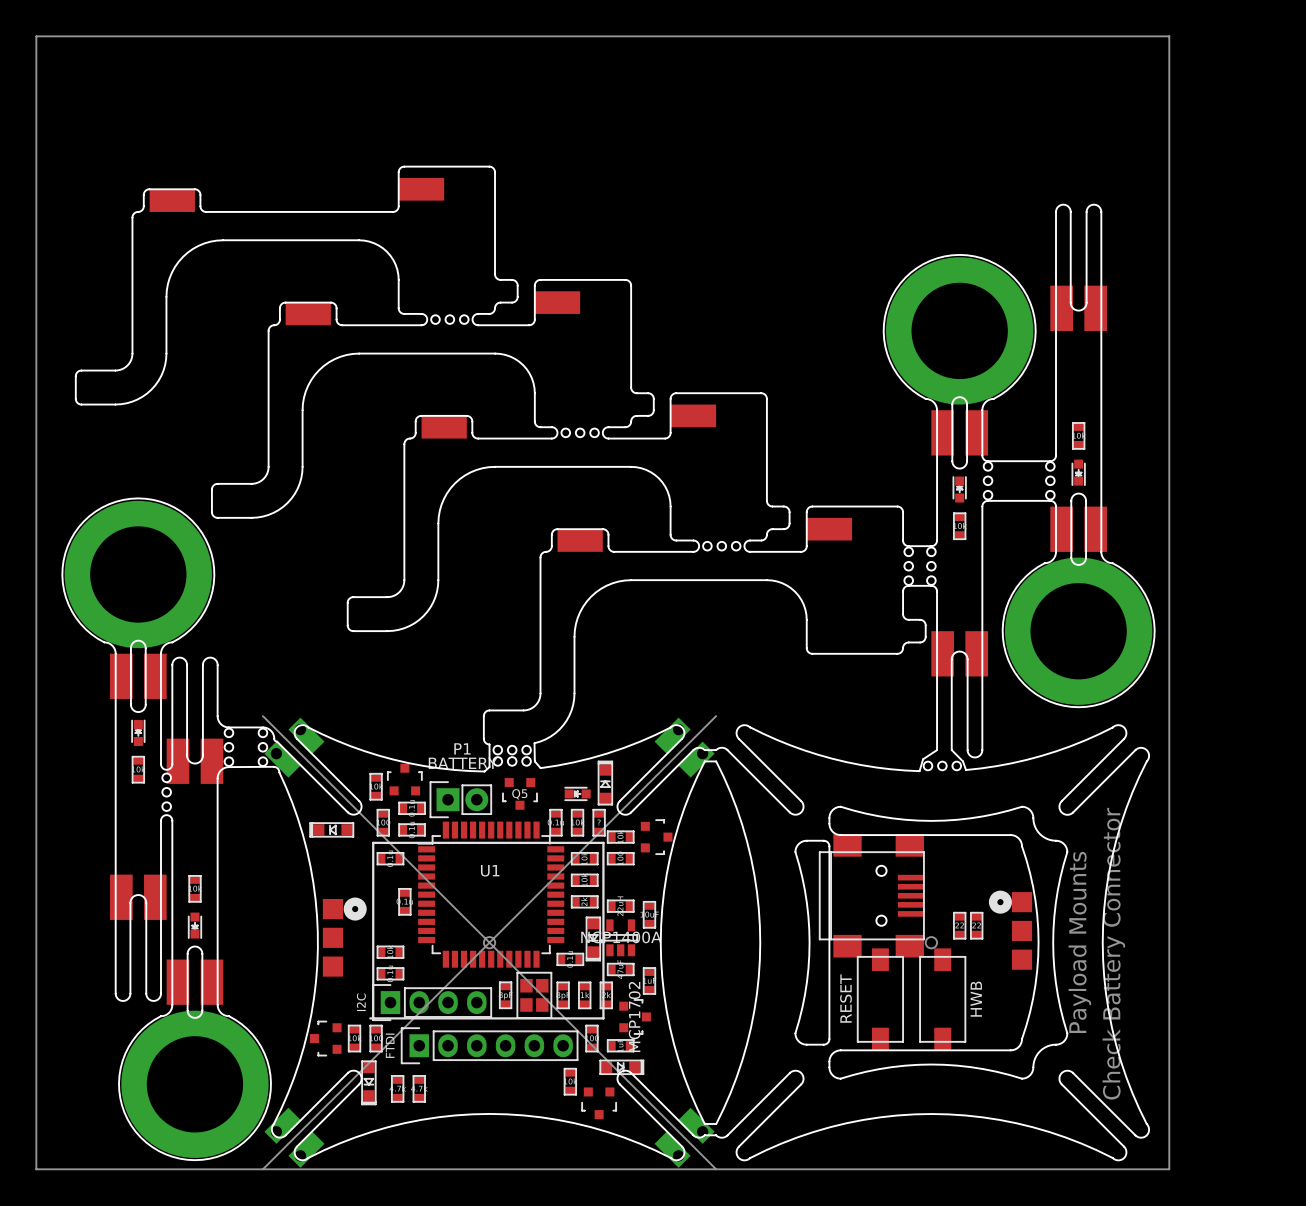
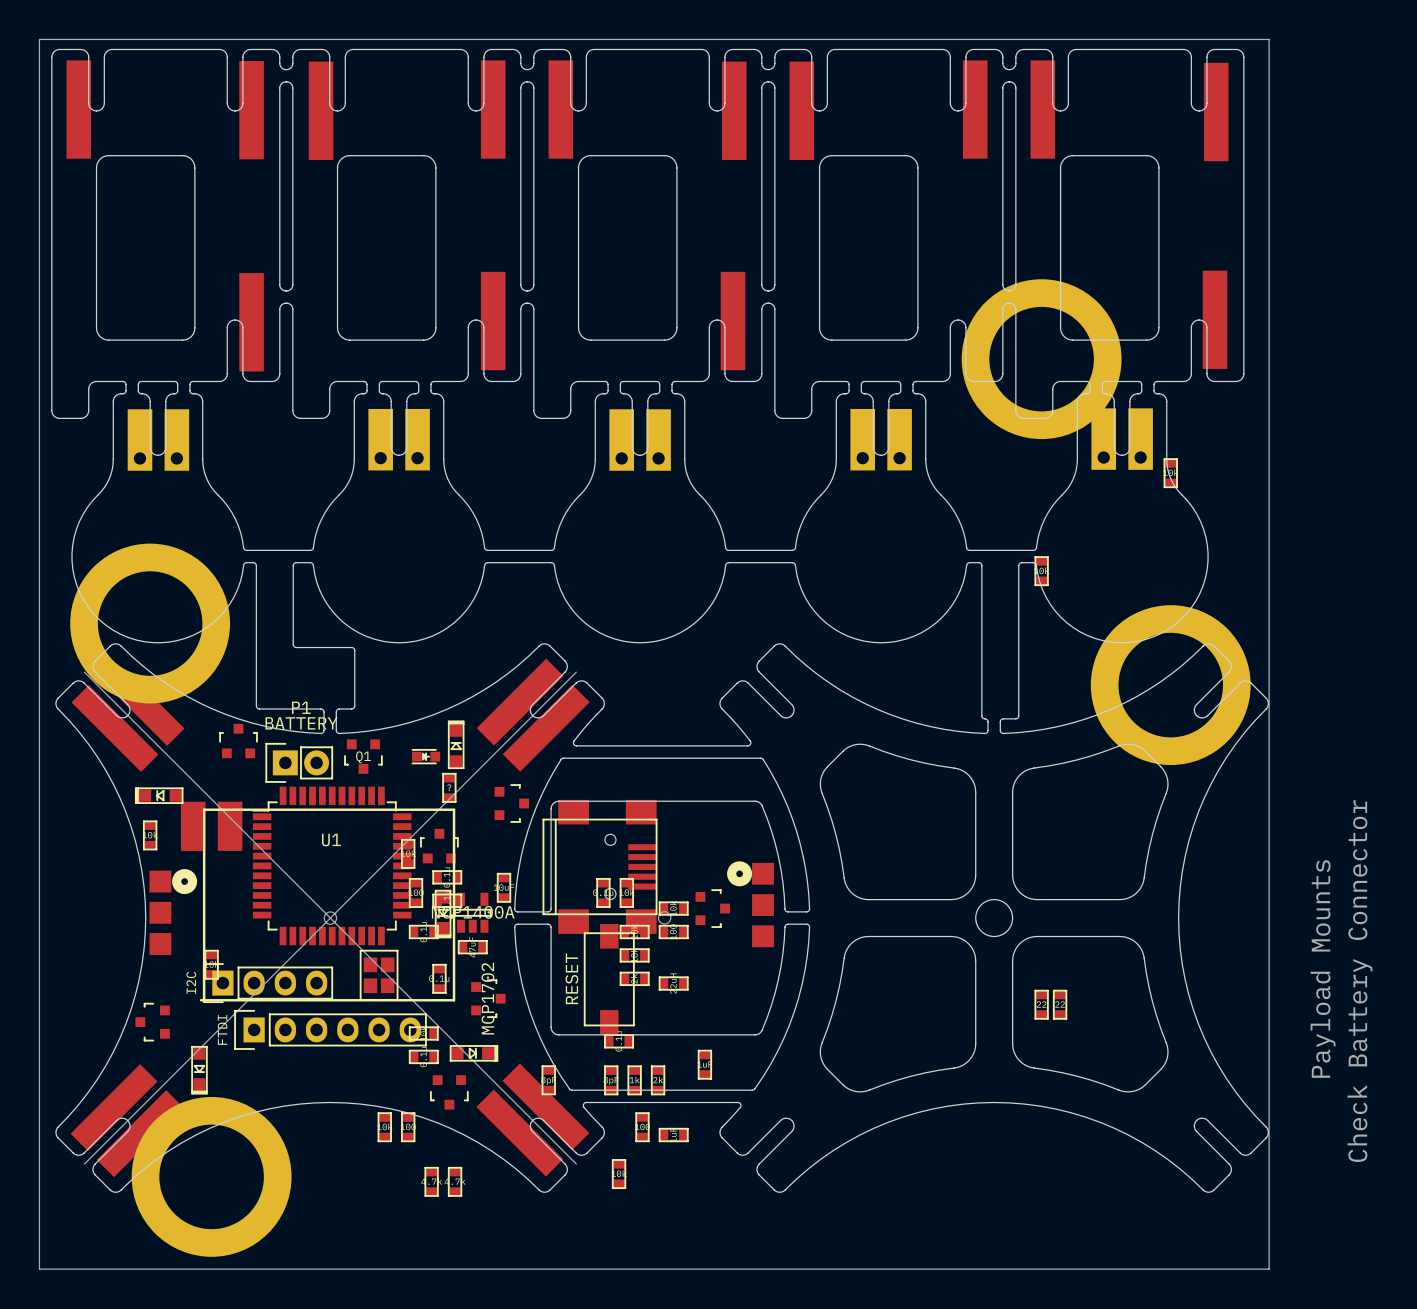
board edge: none -> (80, 49) (85, 51) (88, 55) (88, 104) (91, 109) (96, 110)
board edge: none -> (80, 49) (57, 49) (53, 52) (51, 57) (51, 410) (54, 416) (59, 418)
board edge: none -> (219, 49) (224, 51) (227, 55) (227, 104) (230, 109) (235, 110)
board edge: none -> (219, 49) (109, 50) (104, 56) (104, 103)
board edge: none -> (271, 49) (278, 53) (280, 65) (283, 69) (291, 67) (292, 57)
board edge: none -> (271, 49) (249, 49) (243, 53) (242, 104) (239, 109) (235, 110)
board edge: none -> (321, 49) (326, 51) (329, 55) (329, 104) (332, 109) (337, 110)
board edge: none -> (321, 49) (298, 49) (294, 52) (292, 57)
board edge: none -> (460, 49) (465, 51) (468, 56) (468, 106) (472, 109) (477, 110) (481, 108) (483, 103)
board edge: none -> (460, 49) (349, 50) (345, 56) (345, 104) (342, 109) (337, 110)
board edge: none -> (562, 49) (567, 51) (570, 56) (571, 106) (574, 109) (579, 110) (584, 108) (586, 103)
board edge: none -> (562, 49) (539, 49) (535, 52) (533, 57)
board edge: none -> (754, 49) (760, 52) (762, 65) (767, 69) (774, 66) (775, 55) (778, 50) (803, 49)
board edge: none -> (754, 49) (731, 49) (725, 53) (724, 104) (721, 109) (717, 110) (712, 109) (709, 105) (709, 56) (704, 50) (592, 49) (586, 56) (586, 103)
board edge: none -> (803, 49) (808, 51) (811, 55) (811, 104) (814, 109) (819, 110)
board edge: none -> (942, 49) (947, 51) (950, 56) (950, 106) (954, 109) (959, 110) (963, 108) (965, 103)
board edge: none -> (942, 49) (834, 49) (829, 51) (827, 57)
board edge: none -> (1183, 49) (1188, 51) (1191, 55) (1191, 104) (1193, 108) (1199, 110)
board edge: none -> (1183, 49) (1072, 50) (1068, 56) (1068, 104) (1066, 108) (1060, 110)
board edge: none -> (483, 57) (483, 103)
board edge: none -> (483, 57) (485, 52) (489, 49) (515, 49) (520, 54) (521, 66) (526, 69) (533, 66) (533, 57)
board edge: none -> (827, 57) (827, 104) (824, 109) (819, 110)
board edge: none -> (1206, 57) (1206, 104) (1204, 108) (1199, 110)
board edge: none -> (1206, 57) (1209, 51) (1214, 49) (1238, 49) (1243, 56) (1243, 374) (1241, 379) (1237, 381) (1213, 381) (1208, 378) (1206, 326) (1203, 321) (1197, 320) (1191, 326) (1190, 377) (1184, 381) (1155, 381) (1154, 391) (1158, 393)
board edge: none -> (285, 81) (291, 83) (292, 88) (292, 284) (291, 289) (286, 290) (281, 289) (279, 284) (279, 88) (281, 83) (285, 81)
board edge: none -> (526, 81) (532, 83) (533, 88) (533, 284) (532, 289) (527, 290) (522, 289) (520, 284) (520, 88) (522, 83) (526, 81)
board edge: none -> (767, 81) (773, 83) (774, 88) (774, 284) (773, 289) (768, 290) (763, 289) (761, 284) (761, 88) (763, 83) (767, 81)
board edge: none -> (1008, 81) (1014, 83) (1015, 88) (1015, 284) (1014, 289) (1009, 290) (1004, 289) (1002, 284) (1002, 88) (1004, 83) (1008, 81)
board edge: none -> (104, 103) (102, 108) (96, 110)
board edge: none -> (965, 103) (965, 57) (969, 51) (998, 50) (1002, 54) (1003, 66) (1009, 69) (1015, 66) (1016, 55) (1019, 50) (1045, 49) (1050, 51) (1052, 56) (1053, 105) (1055, 109) (1060, 110)
part: none -> (78, 109)
part: none -> (493, 109)
part: none -> (560, 109)
part: none -> (975, 109)
part: none -> (1042, 109)
part: none -> (251, 110)
part: none -> (321, 110)
part: none -> (734, 110)
part: none -> (801, 110)
part: none -> (1216, 112)
board edge: none -> (108, 155) (184, 155) (190, 158) (193, 163) (194, 327) (192, 335) (187, 339) (107, 340) (101, 337) (97, 332) (96, 167) (100, 159) (108, 155)
board edge: none -> (349, 155) (425, 155) (431, 158) (434, 163) (435, 327) (433, 335) (428, 339) (348, 340) (342, 337) (338, 332) (337, 167) (341, 159) (349, 155)
board edge: none -> (590, 155) (666, 155) (672, 158) (675, 163) (676, 327) (674, 335) (669, 339) (589, 340) (583, 337) (579, 332) (578, 167) (582, 159) (590, 155)
board edge: none -> (831, 155) (907, 155) (913, 158) (916, 163) (917, 327) (915, 335) (910, 339) (830, 340) (824, 337) (820, 332) (819, 167) (823, 159) (831, 155)
board edge: none -> (1072, 155) (1148, 155) (1154, 158) (1158, 163) (1158, 327) (1156, 335) (1151, 339) (1071, 340) (1065, 337) (1061, 332) (1060, 167) (1064, 159) (1072, 155)
part: (421, 189) -> none
part: (172, 200) -> none
part: none -> (1215, 319)
part: none -> (493, 321)
part: none -> (732, 321)
part: none -> (251, 322)
board edge: none -> (227, 327) (228, 323) (233, 320) (239, 321) (242, 324) (242, 373) (245, 379) (250, 381) (274, 380) (279, 374) (280, 307) (285, 303) (291, 305) (292, 411) (295, 416) (300, 418)
board edge: none -> (227, 327) (226, 377) (220, 381) (191, 381) (189, 391) (199, 395) (202, 400) (202, 459) (204, 473) (211, 487) (227, 506) (235, 518) (244, 549) (312, 549) (321, 518) (350, 478) (354, 459)
part: (557, 302) -> none
part: (1078, 308) -> none
part: (308, 313) -> none
part: (449, 319) -> none
board edge: none -> (520, 373) (520, 308) (523, 304) (528, 303) (533, 308) (533, 410) (536, 416) (541, 418) (567, 416) (570, 411) (571, 387) (575, 382) (604, 381) (607, 383) (607, 392) (599, 394) (595, 400) (594, 469) (586, 487) (570, 506) (562, 518) (553, 549) (486, 550) (476, 518) (468, 506) (452, 487) (445, 473) (443, 459) (443, 400) (439, 394) (431, 392) (431, 384) (433, 381) (461, 381) (466, 378) (468, 326) (470, 322) (475, 320) (480, 321) (483, 326) (485, 378) (490, 381) (514, 381) (519, 378) (520, 373)
board edge: none -> (709, 373) (709, 326) (712, 321) (718, 320) (722, 322) (724, 326) (725, 375) (727, 379) (732, 381)
board edge: none -> (709, 373) (707, 378) (703, 381) (673, 381) (672, 391) (681, 395) (684, 400) (684, 459) (686, 473) (693, 487) (709, 506) (717, 518) (726, 549) (794, 549) (803, 518) (832, 478) (836, 459)
board edge: none -> (1002, 373) (1002, 308) (1005, 304) (1010, 303) (1014, 305) (1015, 309) (1015, 411) (1018, 416) (1023, 418)
board edge: none -> (1002, 373) (1001, 378) (997, 381) (973, 381)
board edge: none -> (732, 381) (755, 381) (760, 377) (761, 308) (765, 303) (771, 304) (774, 309) (774, 411) (777, 416) (782, 418)
board edge: none -> (973, 381) (969, 379) (966, 374) (965, 325) (962, 321) (956, 320) (950, 326) (949, 377) (943, 381) (914, 381) (913, 390) (914, 393) (922, 395) (925, 400) (925, 459) (927, 473) (934, 487) (950, 506) (958, 518) (967, 549) (1035, 549) (1044, 518) (1073, 478) (1077, 459)
board edge: none -> (88, 389) (90, 384) (94, 381) (124, 381) (125, 392) (116, 395) (113, 401)
board edge: none -> (88, 389) (88, 411) (86, 416) (81, 418) (59, 418)
board edge: none -> (329, 389) (331, 384) (335, 381) (365, 381) (366, 392) (357, 395) (354, 401)
board edge: none -> (329, 389) (329, 411) (327, 416) (322, 418) (300, 418)
board edge: none -> (811, 389) (813, 384) (817, 381) (847, 381) (848, 392) (839, 395) (836, 401)
board edge: none -> (811, 389) (811, 411) (809, 416) (804, 418) (782, 418)
board edge: none -> (1052, 389) (1054, 384) (1058, 381) (1088, 381) (1089, 392) (1080, 395) (1077, 401)
board edge: none -> (1052, 389) (1052, 411) (1050, 416) (1045, 418) (1023, 418)
board edge: none -> (1158, 393) (1164, 396) (1166, 400) (1166, 459) (1168, 473) (1175, 487) (1196, 514) (1205, 537) (1208, 553) (1207, 570) (1199, 593) (1191, 607) (1180, 620) (1159, 634) (1136, 641) (1111, 642) (1087, 635) (1066, 622) (1055, 610) (1045, 596) (1035, 563) (1019, 563) (1018, 716) (1016, 718) (1001, 719) (1000, 730) (1003, 733) (1045, 729) (1072, 723) (1111, 709) (1160, 681) (1207, 643) (1213, 645) (1229, 661) (1231, 667) (1195, 705) (1194, 711) (1196, 715) (1201, 717) (1206, 716) (1243, 681) (1250, 682) (1267, 700) (1267, 707) (1235, 744) (1218, 770) (1204, 797) (1188, 841) (1180, 887) (1178, 918) (1180, 948) (1188, 994) (1198, 1024) (1211, 1052) (1226, 1079) (1268, 1131) (1266, 1137) (1251, 1152) (1244, 1155) (1206, 1119) (1201, 1118) (1196, 1120) (1194, 1126) (1195, 1130) (1231, 1168) (1229, 1175) (1209, 1192) (1203, 1190) (1180, 1169) (1155, 1150) (1128, 1135) (1100, 1122) (1070, 1112) (1040, 1106) (994, 1102) (963, 1104) (932, 1109) (902, 1117) (873, 1128) (833, 1150) (780, 1192) (774, 1190) (759, 1175) (757, 1168) (792, 1130) (793, 1123) (788, 1118) (782, 1119) (747, 1153) (739, 1154) (721, 1137) (719, 1132) (721, 1127) (740, 1107) (740, 1104) (737, 1102) (585, 1102) (583, 1107) (602, 1127) (604, 1132) (602, 1138) (582, 1155) (576, 1152) (542, 1119) (535, 1118) (530, 1124) (531, 1129) (567, 1168) (565, 1175) (545, 1192) (539, 1190) (516, 1169) (491, 1150) (464, 1135) (436, 1122) (406, 1112) (376, 1106) (330, 1102) (299, 1104) (268, 1109) (224, 1122) (182, 1142) (144, 1169) (119, 1191) (111, 1191) (94, 1174) (93, 1167) (128, 1130) (129, 1125) (127, 1120) (122, 1118) (117, 1119) (79, 1155) (73, 1152) (57, 1137) (56, 1131) (97, 1079) (113, 1052) (125, 1024) (135, 994) (142, 964) (145, 918) (144, 887) (135, 841) (119, 797) (105, 770) (88, 744) (57, 707) (56, 700) (73, 682) (80, 681) (117, 716) (122, 717) (127, 715) (129, 710) (128, 705) (93, 667) (95, 661) (110, 645) (116, 643) (163, 681) (212, 709) (238, 718) (279, 729) (320, 733) (324, 730) (323, 711) (322, 709) (259, 709) (256, 707) (256, 565) (254, 563) (244, 564) (237, 589) (229, 604) (219, 616) (199, 631) (176, 640) (152, 642) (127, 637) (106, 625) (88, 607) (80, 593) (74, 578) (72, 561) (72, 545) (76, 529) (83, 514) (109, 478) (113, 459)
board edge: none -> (113, 401) (113, 459)
board edge: none -> (354, 401) (354, 459)
board edge: none -> (836, 401) (836, 459)
board edge: none -> (888, 401) (891, 395) (900, 392) (899, 382) (862, 382) (861, 392) (869, 394) (872, 399) (873, 448) (876, 453) (881, 455)
board edge: none -> (888, 401) (888, 448) (885, 453) (881, 455)
board edge: none -> (1077, 401) (1077, 459)
board edge: (952, 404) (952, 462) (955, 467) (960, 468) (964, 466) (966, 462) (966, 403) (964, 398) (958, 397) (954, 399) (952, 404) -> none
part: none -> (1122, 439)
part: none -> (158, 440)
part: none -> (399, 439)
part: none -> (640, 440)
part: none -> (881, 439)
board edge: none -> (165, 447) (165, 400) (168, 395) (177, 392) (177, 383) (174, 381) (140, 381) (138, 384) (138, 392) (147, 395) (150, 400) (150, 449) (153, 453) (157, 455)
board edge: none -> (165, 447) (163, 452) (157, 455)
board edge: none -> (647, 447) (647, 400) (650, 395) (659, 392) (659, 383) (656, 381) (622, 381) (620, 384) (620, 392) (629, 395) (632, 400) (632, 450) (636, 454) (642, 455) (646, 452) (647, 447)
part: (693, 415) -> none
board edge: none -> (399, 455) (394, 453) (391, 448) (390, 399) (387, 394) (379, 392) (379, 383) (382, 381) (416, 381) (418, 384) (418, 392) (409, 395) (406, 400) (406, 449) (403, 453) (399, 455)
board edge: none -> (1122, 455) (1117, 453) (1114, 449) (1114, 400) (1111, 395) (1102, 392) (1102, 384) (1104, 381) (1138, 381) (1141, 383) (1141, 392) (1133, 394) (1130, 399) (1129, 448) (1127, 452) (1122, 455)
part: (444, 427) -> none
part: (580, 432) -> none
part: (959, 432) -> none
part: (1078, 472) -> none
part: (988, 480) -> none
part: (1050, 480) -> none
part: (959, 489) -> none
board edge: (1071, 500) (1071, 558) (1074, 563) (1079, 564) (1083, 562) (1085, 558) (1085, 499) (1083, 495) (1077, 493) (1073, 495) (1071, 500) -> none
board edge: none -> (296, 562) (312, 563) (316, 581) (323, 597) (332, 611) (344, 623) (366, 636) (382, 641) (399, 642) (415, 641) (431, 636) (446, 628) (459, 617) (474, 597) (481, 581) (484, 564) (487, 562) (552, 563) (564, 597) (579, 617) (592, 628) (607, 636) (623, 641) (640, 642) (656, 641) (672, 636) (687, 628) (700, 617) (715, 597) (727, 562) (793, 563) (805, 597) (820, 617) (833, 628) (848, 636) (864, 641) (881, 642) (897, 641) (913, 636) (935, 623) (947, 611) (956, 597) (963, 581) (967, 564) (979, 562) (981, 565) (981, 715) (987, 720) (987, 731) (984, 733) (943, 729) (916, 723) (876, 709) (827, 681) (784, 645) (779, 643) (774, 645) (759, 661) (757, 667) (792, 705) (793, 710) (791, 715) (787, 717) (781, 716) (744, 681) (737, 682) (720, 701) (721, 708) (750, 741) (749, 745) (575, 745) (573, 741) (602, 708) (603, 701) (586, 682) (579, 681) (542, 716) (538, 717) (532, 715) (530, 710) (531, 705) (567, 667) (565, 661) (549, 645) (544, 643) (539, 645) (496, 681) (447, 709) (394, 726) (338, 733) (336, 730) (336, 710) (352, 708) (354, 706) (354, 649) (351, 647) (293, 646) (293, 565) (296, 562)
part: (829, 529) -> none
part: (1078, 529) -> none
part: (580, 540) -> none
part: (721, 546) -> none
board edge: (1056, 551) (1056, 506) (1053, 501) (988, 500) (983, 503) (982, 751) (980, 755) (975, 757) (970, 755) (967, 752) (967, 658) (964, 653) (959, 651) (954, 653) (951, 658) (951, 750) (962, 761) (966, 770) (981, 768) (1041, 755) (1084, 740) (1115, 725) (1122, 726) (1126, 732) (1124, 738) (1060, 802) (1060, 810) (1067, 814) (1073, 812) (1136, 749) (1143, 748) (1148, 752) (1148, 758) (1126, 808) (1111, 857) (1106, 891) (1102, 942) (1106, 994) (1111, 1027) (1126, 1077) (1148, 1126) (1148, 1133) (1142, 1137) (1136, 1136) (1071, 1071) (1063, 1071) (1059, 1078) (1061, 1084) (1124, 1147) (1126, 1153) (1123, 1158) (1116, 1160) (1065, 1137) (1016, 1123) (965, 1115) (931, 1114) (880, 1117) (846, 1123) (797, 1137) (747, 1159) (740, 1159) (736, 1154) (738, 1147) (802, 1082) (802, 1074) (795, 1070) (789, 1073) (727, 1135) (721, 1137) (716, 1135) (695, 1136) (630, 1072) (625, 1070) (620, 1072) (617, 1077) (619, 1083) (683, 1148) (683, 1155) (677, 1160) (623, 1137) (591, 1127) (540, 1117) (489, 1113) (455, 1115) (404, 1123) (355, 1137) (305, 1159) (298, 1159) (294, 1154) (296, 1147) (360, 1082) (360, 1074) (353, 1070) (347, 1073) (285, 1135) -> none
board edge: (1056, 551) (1052, 559) (1031, 571) (1012, 593) (1003, 622) (1005, 652) (1019, 678) (1042, 698) (1071, 706) (1100, 703) (1121, 694) (1137, 678) (1149, 659) (1154, 630) (1150, 607) (1140, 587) (1125, 571) (1105, 560) (1101, 553) (1101, 212) (1096, 205) (1090, 205) (1086, 211) (1086, 303) (1084, 308) (1079, 310) (1073, 308) (1070, 303) (1070, 210) (1067, 206) (1062, 204) (1058, 206) (1056, 211) (1056, 455) (1054, 459) (1050, 461) (988, 461) (983, 458) (983, 405) (986, 401) (1000, 395) (1012, 385) (1025, 368) (1033, 347) (1034, 317) (1023, 289) (1002, 267) (974, 256) (952, 255) (937, 258) (917, 267) (900, 283) (886, 309) (883, 332) (887, 354) (897, 374) (912, 390) (932, 401) (936, 407) (936, 543) (931, 546) (904, 544) (903, 511) (898, 506) (812, 506) (806, 511) (806, 546) (804, 550) (750, 551) (744, 548) (746, 541) (763, 540) (769, 529) (785, 528) (789, 524) (787, 508) (771, 506) (766, 501) (766, 398) (764, 394) (674, 393) (670, 398) (670, 433) (667, 437) (608, 438) (603, 435) (603, 430) (606, 427) (627, 426) (633, 416) (649, 415) (653, 410) (652, 394) (635, 393) (631, 388) (631, 285) (628, 281) (539, 280) (534, 284) (534, 320) (532, 324) (478, 325) (473, 323) (472, 318) (475, 314) (491, 313) (497, 303) (513, 302) (517, 297) (516, 281) (499, 279) (495, 274) (495, 172) (492, 167) (402, 167) (398, 171) (398, 207) (393, 211) (205, 211) (200, 208) (200, 193) (196, 189) (147, 189) (143, 193) (143, 209) (134, 213) (132, 216) (131, 357) (127, 365) (119, 369) (77, 372) (75, 398) (79, 404) (126, 403) (142, 396) (155, 385) (163, 370) (166, 359) (166, 296) (169, 278) (183, 256) (192, 248) (210, 241) (359, 240) (374, 243) (387, 251) (395, 264) (398, 274) (399, 311) (403, 313) (423, 314) (427, 318) (426, 323) (422, 325) (341, 325) (337, 321) (336, 306) (333, 303) (285, 302) (281, 304) (279, 322) (270, 326) (268, 330) (268, 471) (263, 478) (256, 483) (214, 485) (211, 488) (211, 512) (214, 517) (262, 516) (278, 510) (291, 498) (299, 483) (302, 472) (302, 410) (305, 391) (319, 370) (329, 362) (346, 354) (495, 353) (510, 356) (523, 365) (531, 378) (534, 388) (535, 424) (539, 427) (553, 427) (557, 430) (556, 435) (552, 438) (477, 438) (472, 434) (472, 420) (468, 416) (421, 415) (417, 417) (414, 435) (406, 439) (404, 443) (403, 584) (399, 592) (391, 596) (349, 598) (347, 602) (347, 625) (350, 630) (398, 629) (414, 623) (427, 611) (435, 596) (438, 585) (438, 523) (441, 504) (454, 483) (464, 475) (482, 468) (630, 466) (646, 469) (659, 478) (667, 491) (670, 501) (671, 537) (675, 540) (694, 540) (698, 544) (698, 549) (694, 551) (613, 551) (608, 548) (608, 533) (604, 529) (554, 530) (551, 534) (551, 549) (542, 553) (540, 556) (539, 697) (535, 705) (527, 709) (489, 710) (485, 712) (483, 739) (489, 744) (489, 767) (484, 771) (438, 768) (408, 763) (350, 746) (304, 725) (296, 728) (294, 733) (296, 737) (359, 801) -> none
part: (908, 566) -> none
part: (931, 566) -> none
board edge: (130, 648) (131, 705) (133, 710) (139, 711) (143, 709) (145, 705) (145, 647) (142, 642) (137, 640) (133, 642) (130, 648) -> none
part: (959, 653) -> none
part: none -> (533, 715)
part: none -> (127, 715)
part: (138, 676) -> none
part: none -> (238, 741)
part: none -> (456, 744)
board edge: none -> (869, 746) (911, 759) (959, 769) (971, 778) (975, 792) (975, 878) (970, 889) (963, 896) (951, 899) (865, 899) (854, 895) (848, 888) (844, 880) (835, 834) (821, 790) (820, 779) (825, 768) (847, 747) (858, 744) (869, 746)
board edge: none -> (1118, 746) (1077, 759) (1028, 769) (1016, 778) (1012, 792) (1012, 878) (1017, 889) (1024, 896) (1037, 899) (1122, 899) (1131, 896) (1139, 888) (1143, 880) (1152, 834) (1167, 790) (1167, 779) (1162, 768) (1140, 747) (1130, 744) (1118, 746)
Q1: none -> (363, 756)
part: none -> (425, 756)
board edge: none -> (563, 758) (762, 758) (782, 794) (796, 831) (805, 869) (809, 910) (788, 911) (785, 910) (780, 869) (775, 843) (762, 805) (758, 802) (558, 801) (554, 802) (551, 808) (550, 910) (547, 911) (516, 911) (516, 882) (527, 831) (542, 794) (554, 770) (563, 758)
line: (262, 716) (716, 1169) -> (84, 672) (576, 1164)
line: (716, 716) (262, 1169) -> (576, 672) (84, 1164)
part footprint: [131, 719, 146, 747] -> [134, 787, 184, 804]
board edge: (750, 727) (790, 745) (832, 758) (875, 767) (919, 771) -> none
board edge: (750, 727) (744, 725) (738, 727) (736, 733) (738, 738) (801, 801) -> none
part: none -> (511, 803)
board edge: (534, 743) (534, 761) (540, 768) (574, 762) (607, 753) (639, 741) (673, 725) (681, 726) (684, 732) (682, 738) (618, 802) (618, 810) (625, 814) (631, 812) (695, 748) (716, 750) (721, 747) (727, 750) -> none
board edge: (534, 743) (555, 733) (569, 715) (574, 699) (574, 636) (577, 618) (591, 596) (612, 583) (631, 580) (767, 580) (782, 583) (795, 591) (803, 604) (806, 614) (806, 648) (812, 653) (898, 653) (901, 651) (906, 642) (922, 641) (925, 637) (924, 622) (920, 619) (907, 619) (903, 616) (903, 590) (907, 585) (932, 585) (937, 591) (937, 750) (923, 759) (919, 771) -> none
part: (228, 747) -> none
part: (262, 747) -> none
part: (294, 747) -> none
part: (684, 747) -> none
part: (512, 750) -> none
board edge: (727, 750) (789, 812) -> none
part: (512, 761) -> none
board edge: (716, 761) (704, 761) (678, 824) (666, 874) (660, 942) (664, 993) (678, 1060) (704, 1123) (716, 1123) -> none
board edge: (716, 761) (736, 808) (746, 841) (756, 891) (760, 942) (756, 993) (746, 1044) (736, 1077) (716, 1124) -> none
part: (942, 765) -> none
part: (605, 783) -> none
part: (166, 792) -> none
Q5: (519, 793) -> none
part: (577, 793) -> none
part: none -> (600, 866)
P1 position: (460, 799) -> (299, 762)
board edge: (359, 800) (361, 806) (359, 812) (353, 814) (347, 812) -> none
board edge: (801, 801) (803, 806) (801, 812) (795, 814) (789, 812) -> none
board edge: (840, 806) (832, 810) (829, 818) (830, 829) (839, 834) (1010, 835) (1017, 837) (1021, 843) (1033, 886) (1038, 928) (1038, 956) (1030, 1012) (1021, 1043) (1016, 1048) (839, 1050) (833, 1052) (829, 1058) (829, 1068) (831, 1074) (840, 1078) (892, 1067) (931, 1064) (970, 1067) (1022, 1078) (1028, 1076) (1032, 1071) (1035, 1058) (1039, 1051) (1047, 1046) (1061, 1043) (1067, 1034) (1055, 982) (1053, 942) (1055, 903) (1067, 852) (1064, 845) (1060, 841) (1047, 839) (1039, 834) (1035, 826) (1031, 812) (1023, 806) (970, 818) (931, 820) (879, 816) (840, 806) -> none
board edge: (347, 812) (275, 740) (269, 729) (262, 727) (227, 727) (220, 724) (217, 716) (217, 664) (212, 657) (206, 658) (202, 664) (202, 756) (200, 761) (196, 763) (190, 761) (187, 756) (186, 663) (180, 657) (176, 658) (172, 662) (172, 764) (168, 769) (162, 767) (161, 650) (165, 644) (178, 638) (190, 629) (204, 611) (213, 583) (211, 553) (205, 539) (192, 521) (180, 511) (160, 501) (145, 498) (123, 499) (108, 504) (89, 516) (79, 526) (67, 546) (62, 575) (66, 597) (76, 618) (91, 634) (111, 644) (115, 652) (115, 993) (117, 998) (121, 1000) (127, 999) (130, 994) (130, 901) (132, 897) (137, 895) (143, 896) (146, 901) (146, 995) (149, 999) (153, 1000) (158, 999) (160, 995) (161, 820) (163, 816) (167, 815) (172, 820) (172, 1006) (167, 1013) (154, 1019) (142, 1029) (128, 1046) (119, 1075) (121, 1105) (131, 1125) (146, 1142) (165, 1154) (187, 1159) (217, 1156) (237, 1147) (254, 1131) (265, 1112) (270, 1082) (264, 1053) (247, 1029) (235, 1019) (222, 1013) (217, 1006) (217, 778) (219, 771) (226, 767) (274, 766) (278, 769) (292, 802) (306, 850) (313, 882) (317, 932) (316, 981) (307, 1030) (293, 1078) (271, 1128) (273, 1133) (276, 1137) (285, 1135) -> none
part position: (599, 822) -> (449, 787)
round board edge: none -> [975, 898, 1014, 938]
part rotation: 0° (331, 829) -> 90° counterclockwise (443, 914)
part position: (331, 829) -> (443, 914)
part: none -> (750, 904)
drawing: none -> [323, 911, 338, 925]
drawing: none -> [657, 911, 672, 925]
board edge: (806, 840) (825, 840) (829, 845) (829, 1039) (824, 1044) (803, 1044) (798, 1041) (795, 1034) (806, 982) (809, 942) (806, 903) (795, 852) (798, 844) (806, 840) -> none
board edge: none -> (517, 924) (547, 924) (550, 926) (551, 1028) (553, 1032) (558, 1034) (757, 1034) (762, 1030) (775, 992) (780, 966) (785, 926) (787, 924) (806, 924) (809, 927) (805, 970) (794, 1012) (777, 1052) (754, 1089) (572, 1090) (561, 1076) (546, 1052) (530, 1012) (517, 956) (514, 927) (517, 924)
board edge: none -> (868, 936) (954, 936) (963, 939) (970, 946) (975, 961) (975, 1043) (972, 1055) (965, 1063) (957, 1067) (911, 1076) (861, 1091) (847, 1088) (825, 1067) (820, 1056) (820, 1048) (835, 1001) (845, 952) (854, 940) (868, 936)
board edge: none -> (1037, 936) (1122, 936) (1131, 939) (1139, 947) (1143, 955) (1152, 1001) (1167, 1051) (1166, 1059) (1162, 1067) (1140, 1088) (1130, 1091) (1121, 1090) (1077, 1076) (1028, 1066) (1016, 1057) (1012, 1043) (1012, 957) (1019, 943) (1027, 938) (1037, 936)
U1 position: (490, 894) -> (331, 865)
part: (871, 895) -> none
part: (138, 897) -> none
part: none -> RESET (609, 979)
part position: (649, 914) -> (504, 887)
part: (194, 925) -> none
part: (1010, 930) -> none
drawing: [483, 936, 496, 949] -> none
drawing: [925, 936, 938, 949] -> none
part position: (344, 937) -> (173, 912)
part position: (618, 937) -> (470, 912)
part: (593, 938) -> none
part: none -> (152, 1022)
text position: Payload Mounts (1079, 942) -> Payload Mounts (1323, 969)
board edge: (187, 953) (187, 1011) (190, 1016) (195, 1017) (200, 1015) (202, 1011) (202, 952) (199, 948) (194, 946) (189, 948) (187, 953) -> none
text position: Check Battery Connector (1113, 953) -> Check Battery Connector (1359, 981)
part position: (620, 969) -> (472, 947)
part: none -> (474, 1053)
part: (194, 982) -> none
part: none -> (199, 1070)
part position: (534, 995) -> (379, 975)
part: RESET (880, 999) -> none
part: HWB (942, 999) -> none
part position: (432, 1002) -> (268, 983)
part position: (635, 1016) -> (488, 998)
line: (370, 1018) (603, 1018) (603, 842) (373, 842) (373, 1018) -> (201, 1000) (454, 1000) (454, 809) (204, 809) (204, 1000)
part: none -> (532, 1120)
part: none -> (127, 1120)
part rotation: 0° (325, 1038) -> 90° counterclockwise (449, 1092)
part position: (325, 1038) -> (449, 1092)
part position: (489, 1045) -> (330, 1029)
part: (621, 1067) -> none
part: (368, 1082) -> none
part: (599, 1103) -> none
part: (294, 1137) -> none
part: (684, 1137) -> none

